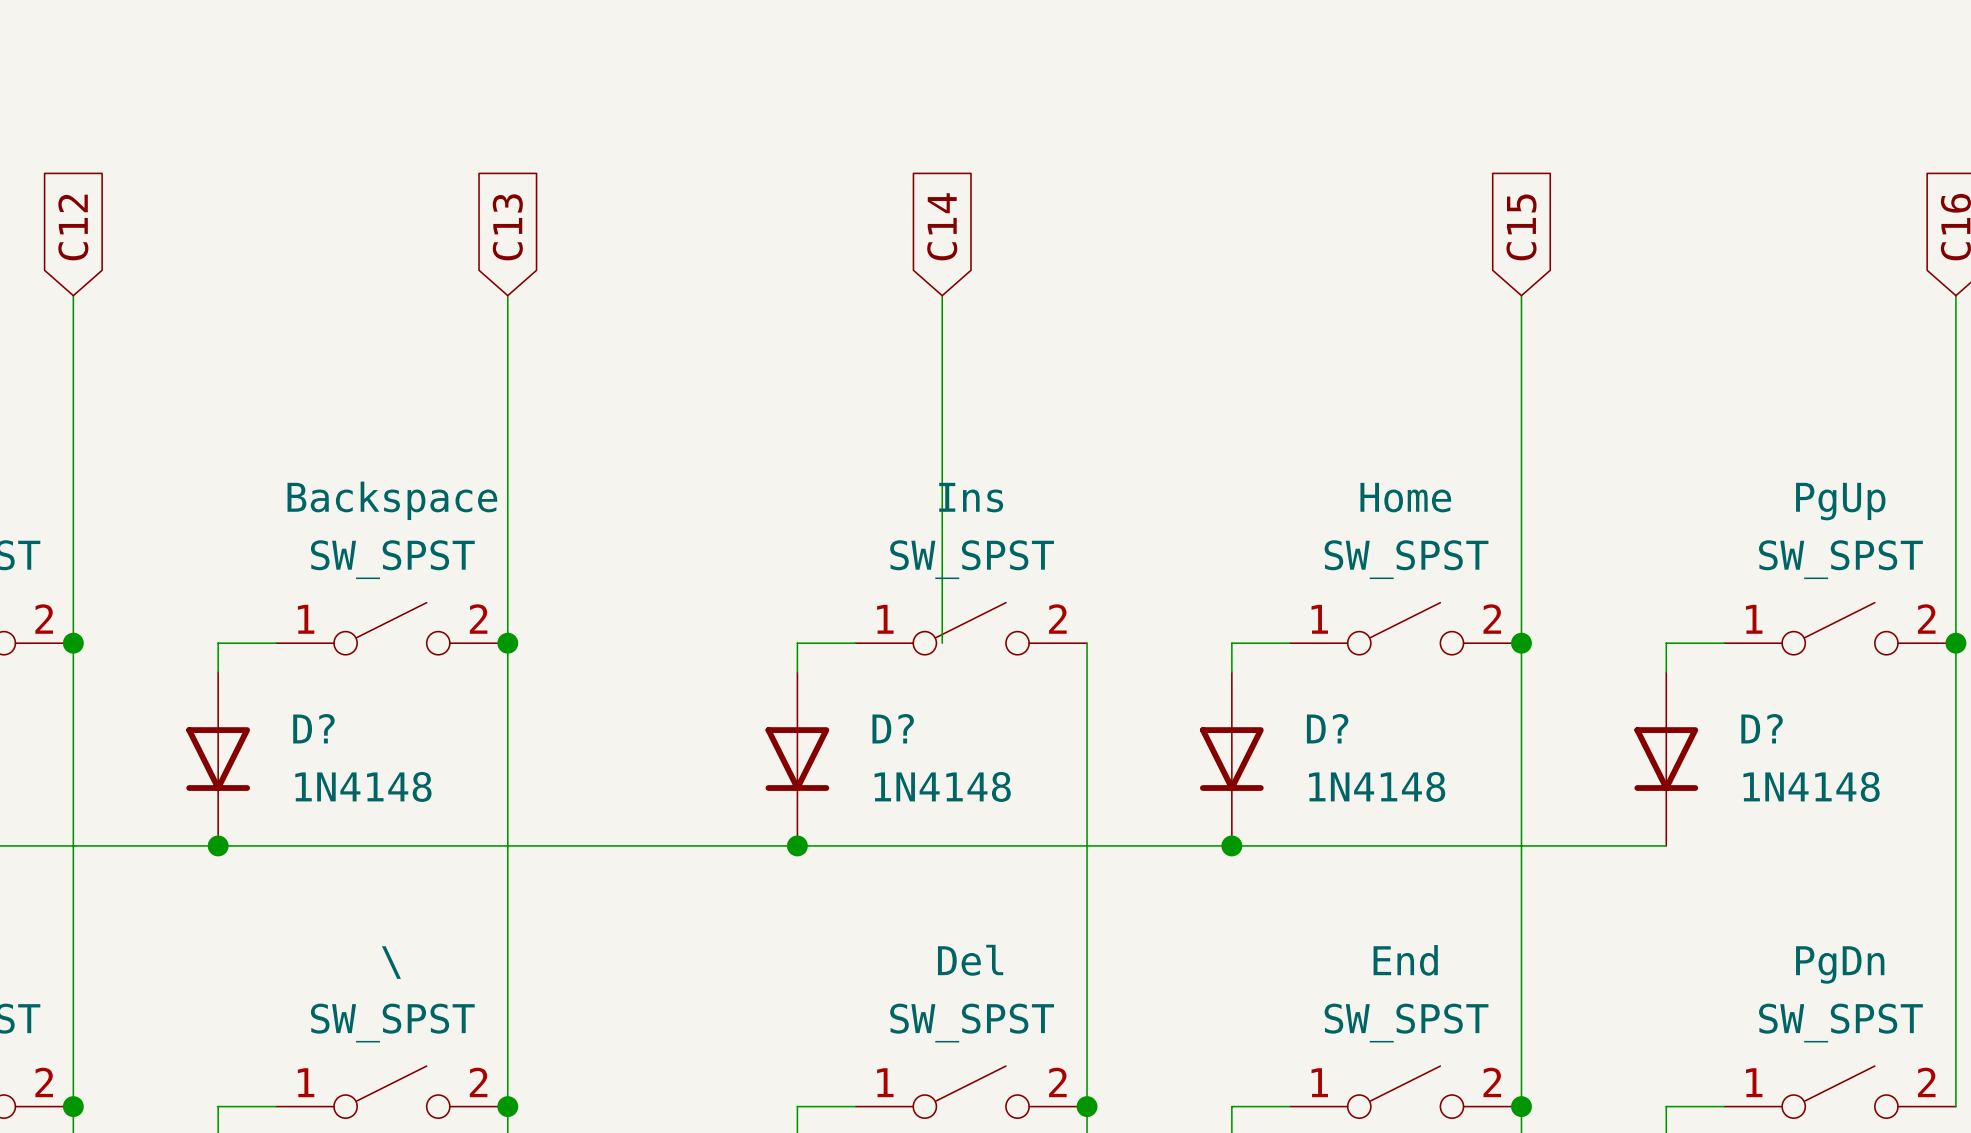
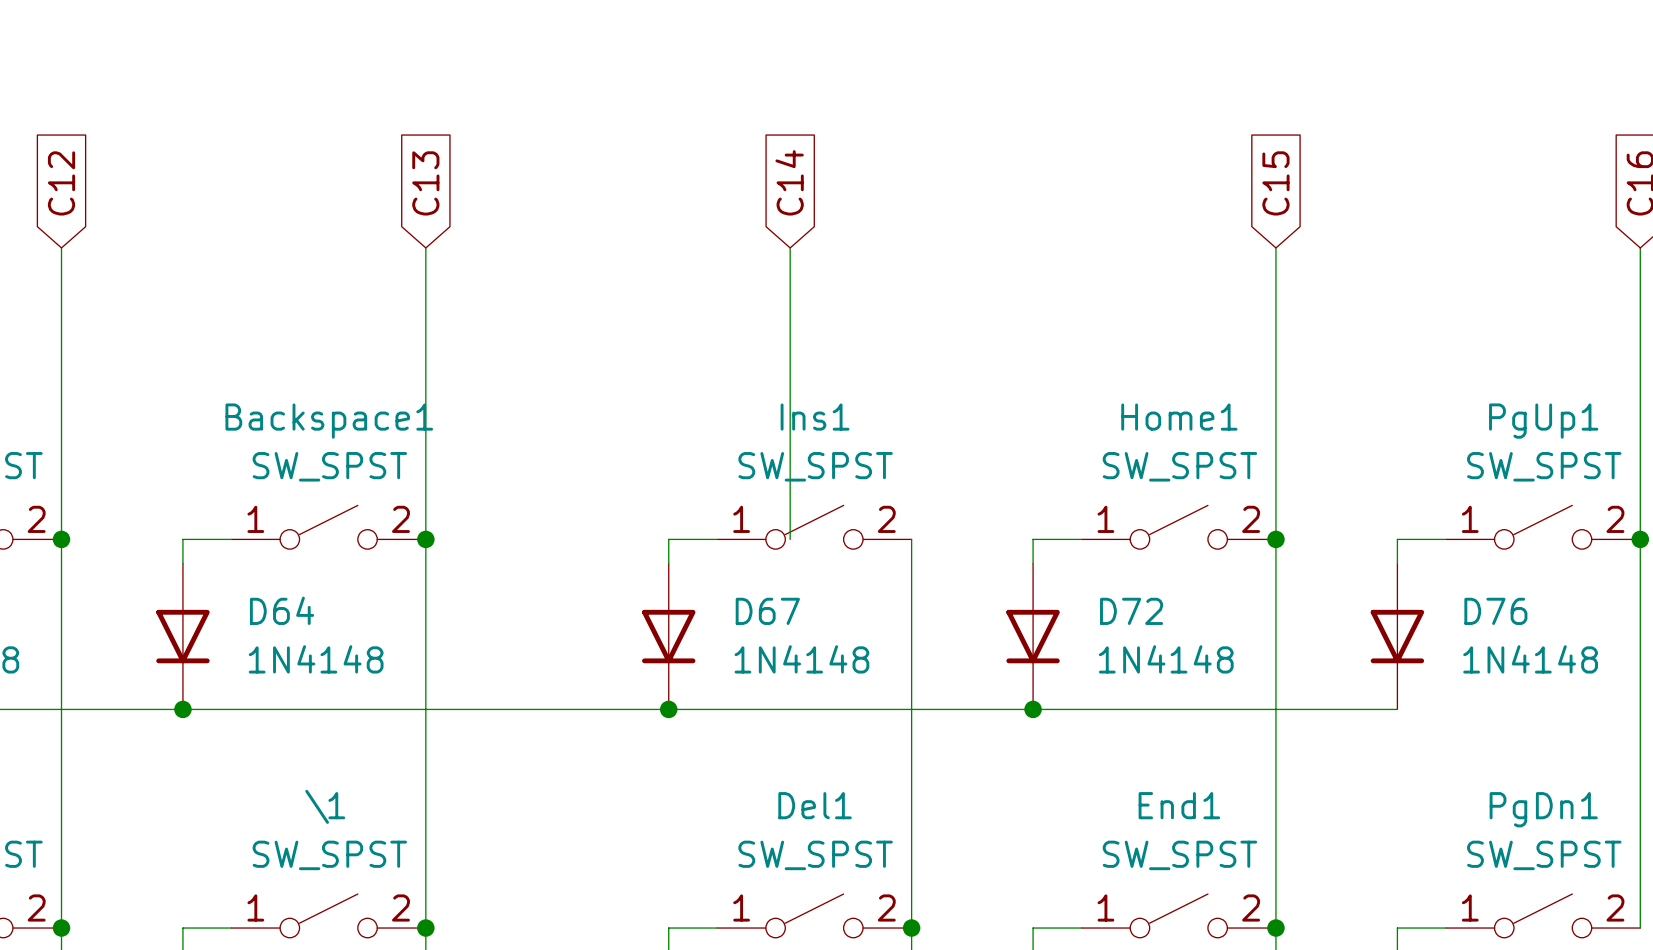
Ins name: Ins (971, 497) -> Ins1 (815, 417)
Home name: Home (1405, 497) -> Home1 (1179, 417)
Backspace name: Backspace (392, 500) -> Backspace1 (329, 421)
PgUp name: PgUp (1840, 501) -> PgUp1 (1543, 421)
D? name: D? (313, 728) -> D64 (282, 610)
D? name: D? (893, 728) -> D67 (767, 611)
D? name: D? (1327, 728) -> D72 (1131, 611)
D? name: D? (1762, 728) -> D76 (1495, 611)
Del name: Del (970, 960) -> Del1 (815, 805)
End name: End (1405, 960) -> End1 (1179, 805)
\1 name: \ (391, 962) -> \1 (325, 806)
PgDn name: PgDn (1840, 964) -> PgDn1 (1543, 809)

